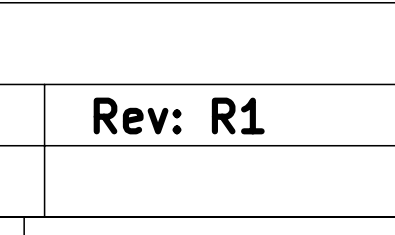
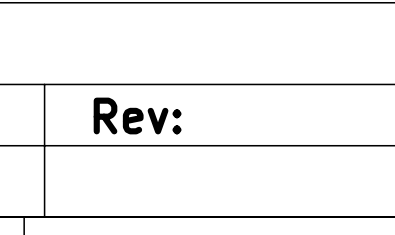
title block: Rev: R1 (179, 115) -> Rev: (137, 115)

